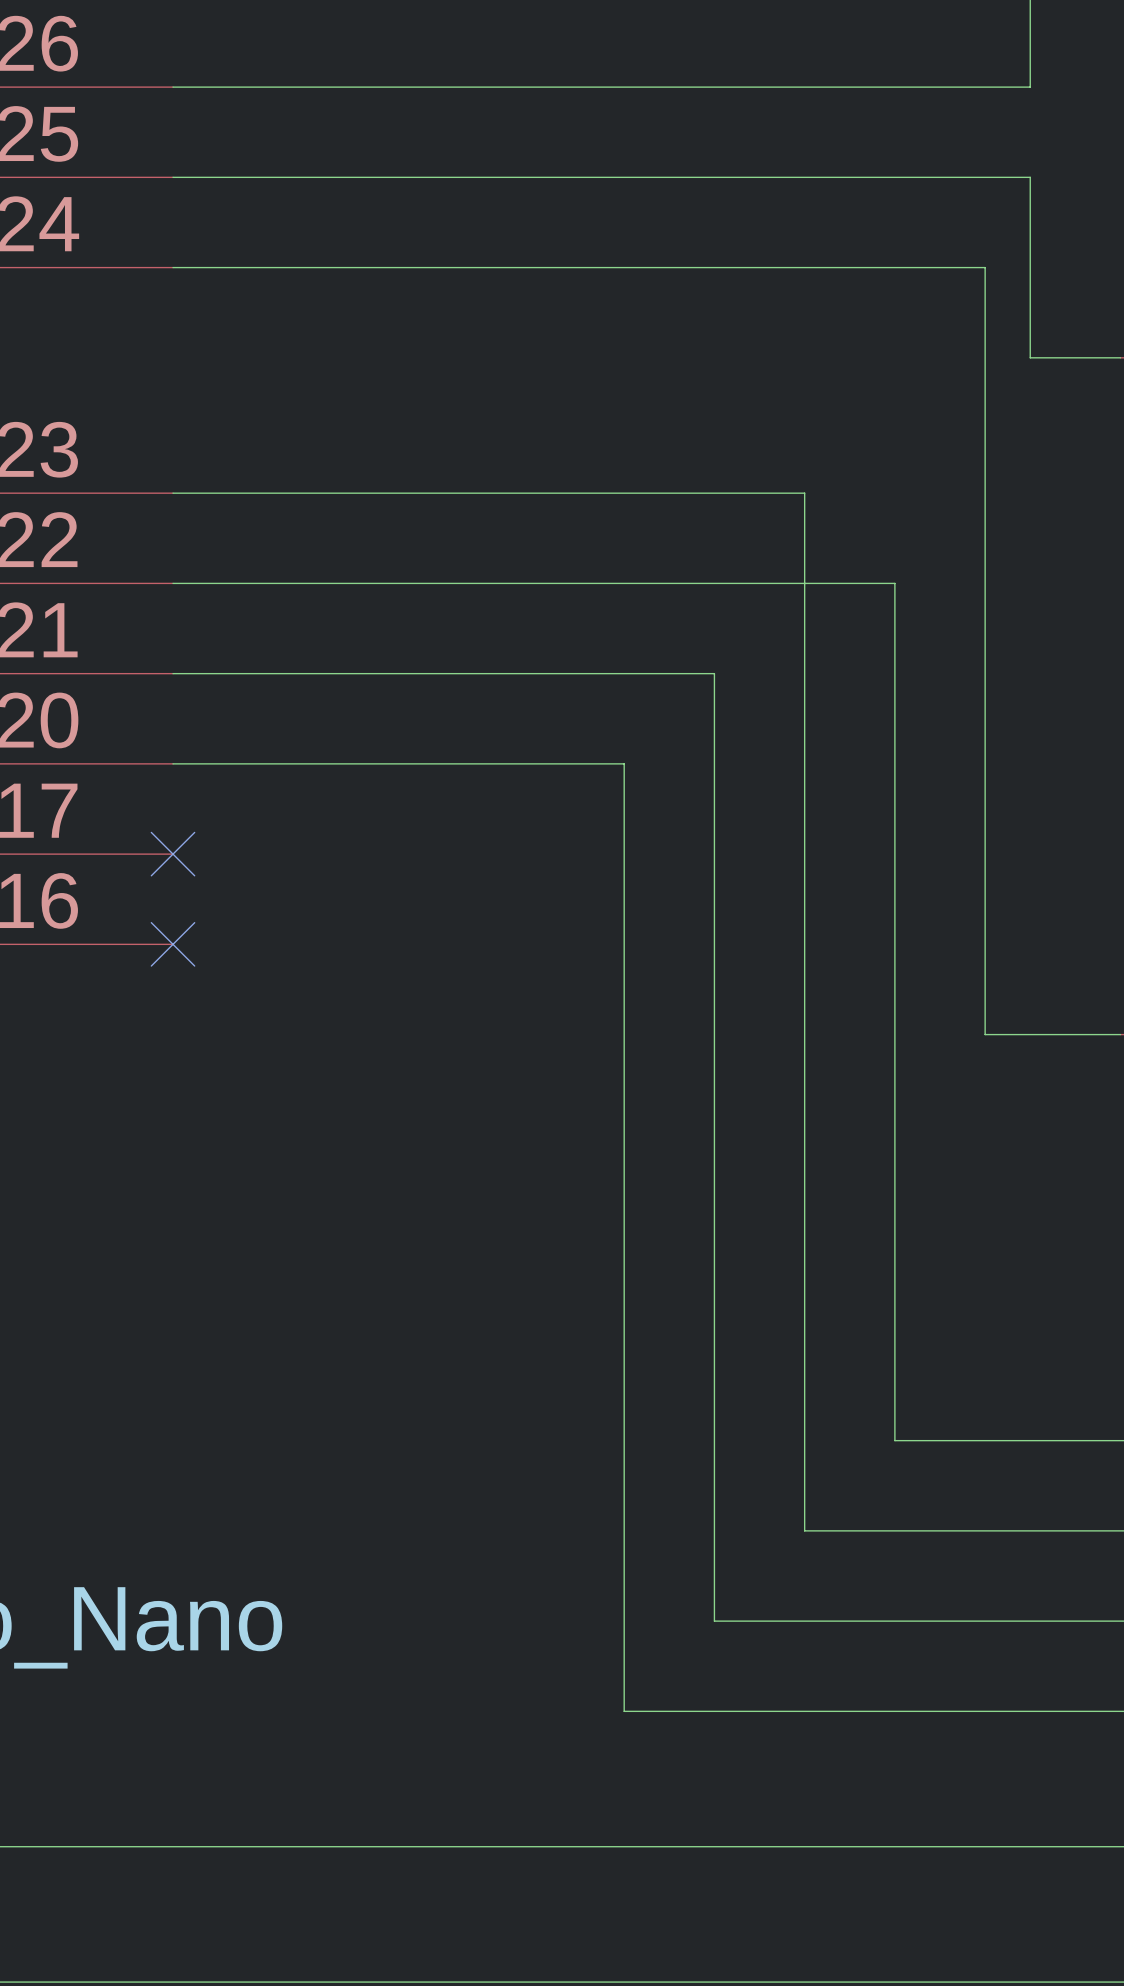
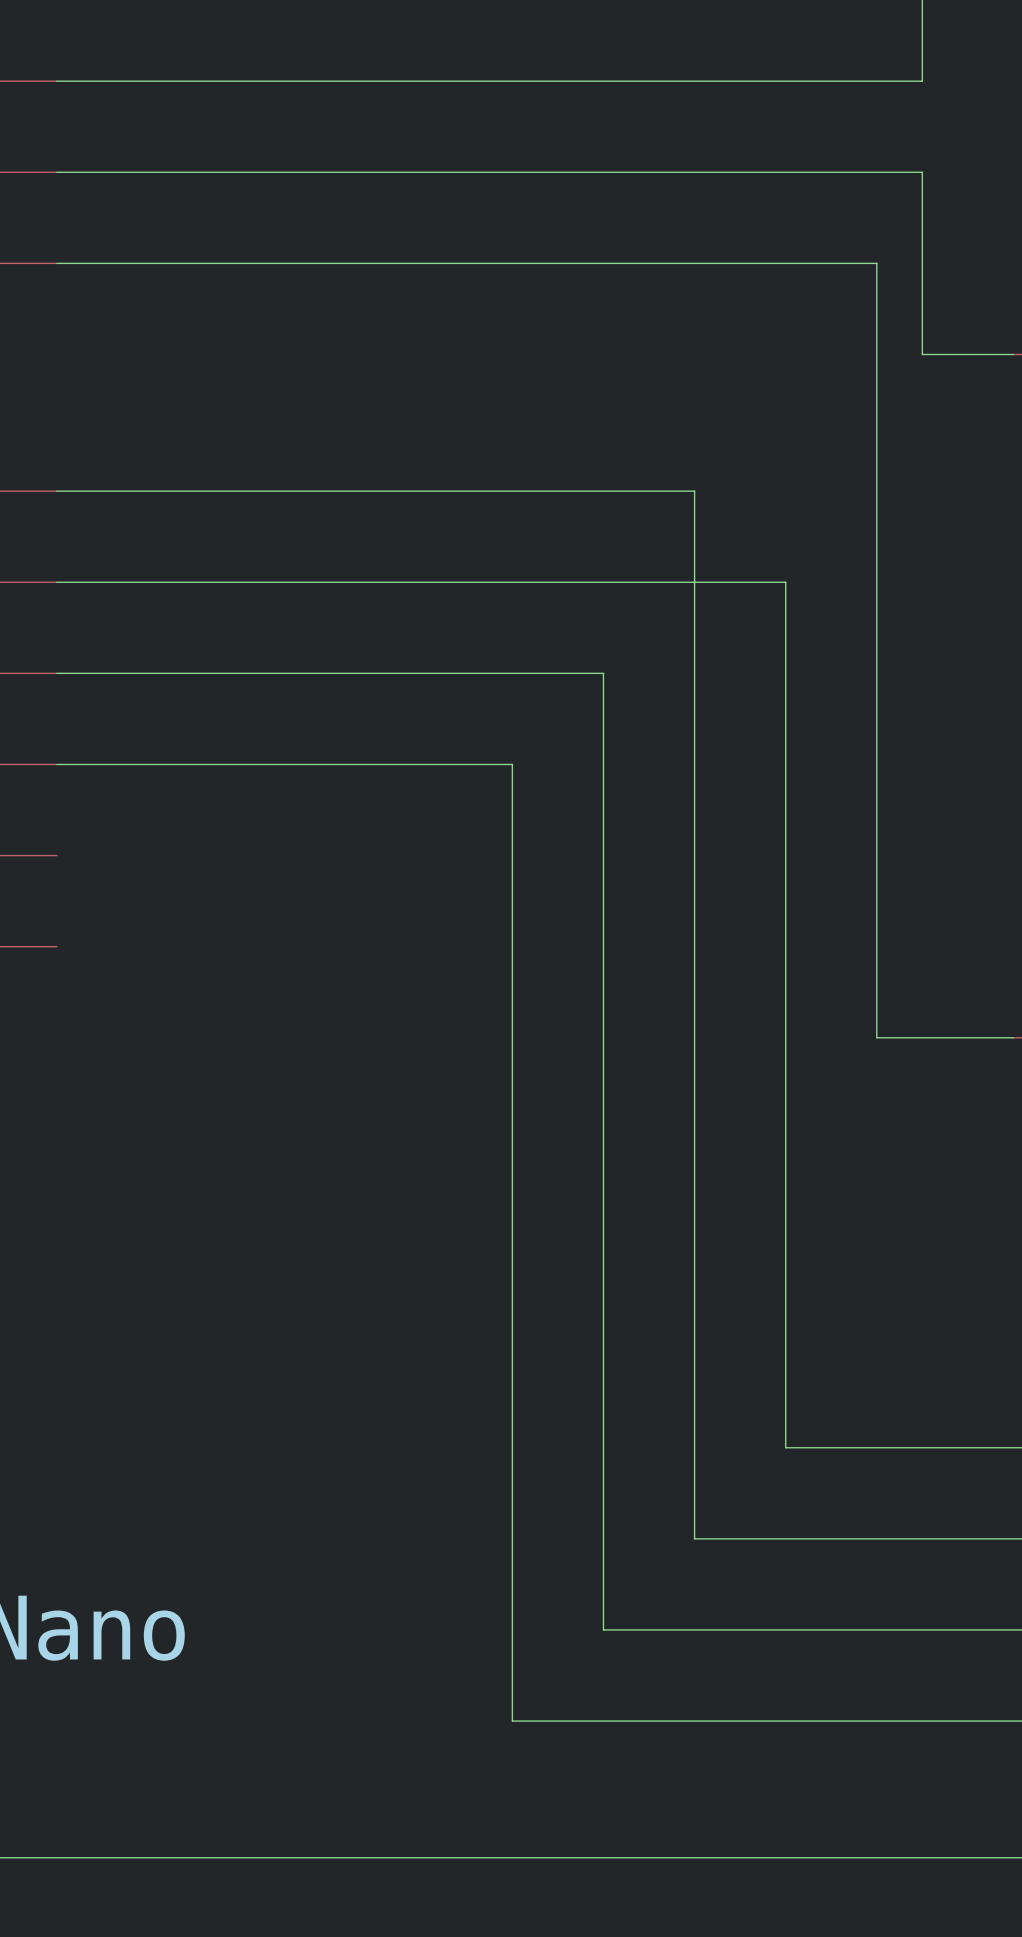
no-connect mark: (173, 854) -> none
no-connect mark: (173, 944) -> none

